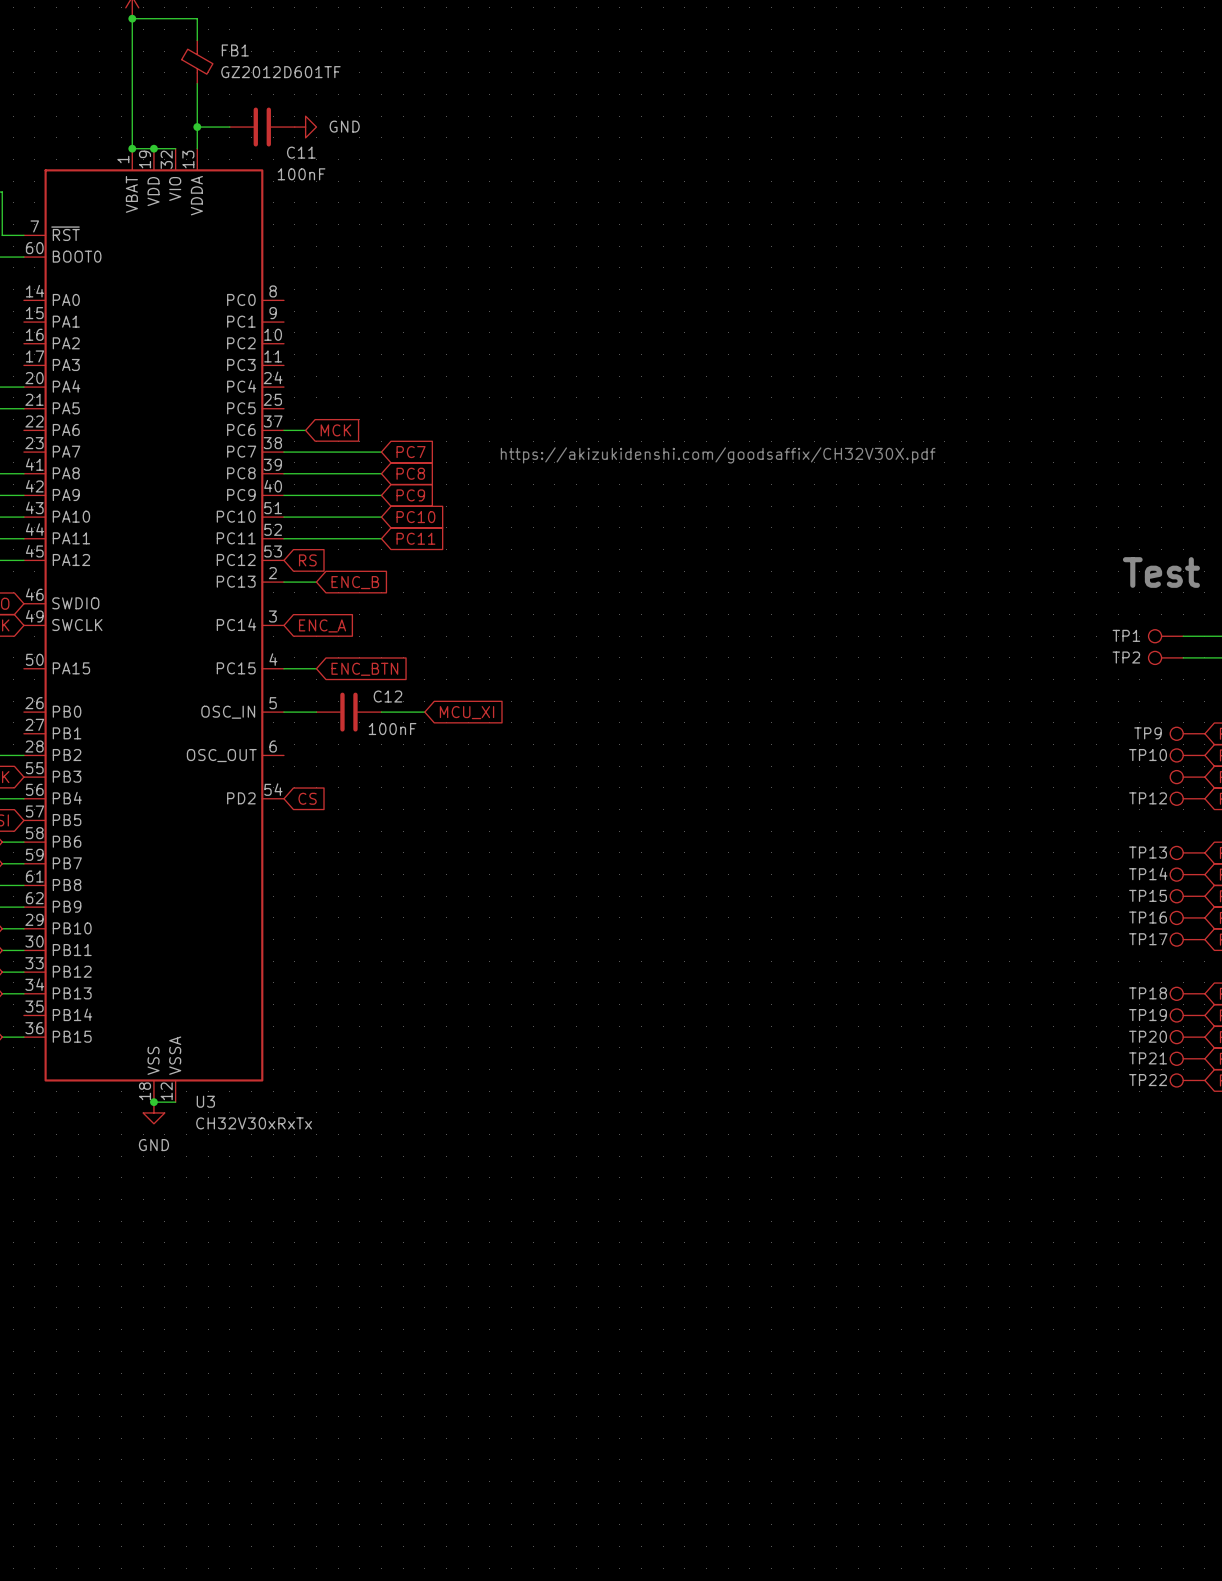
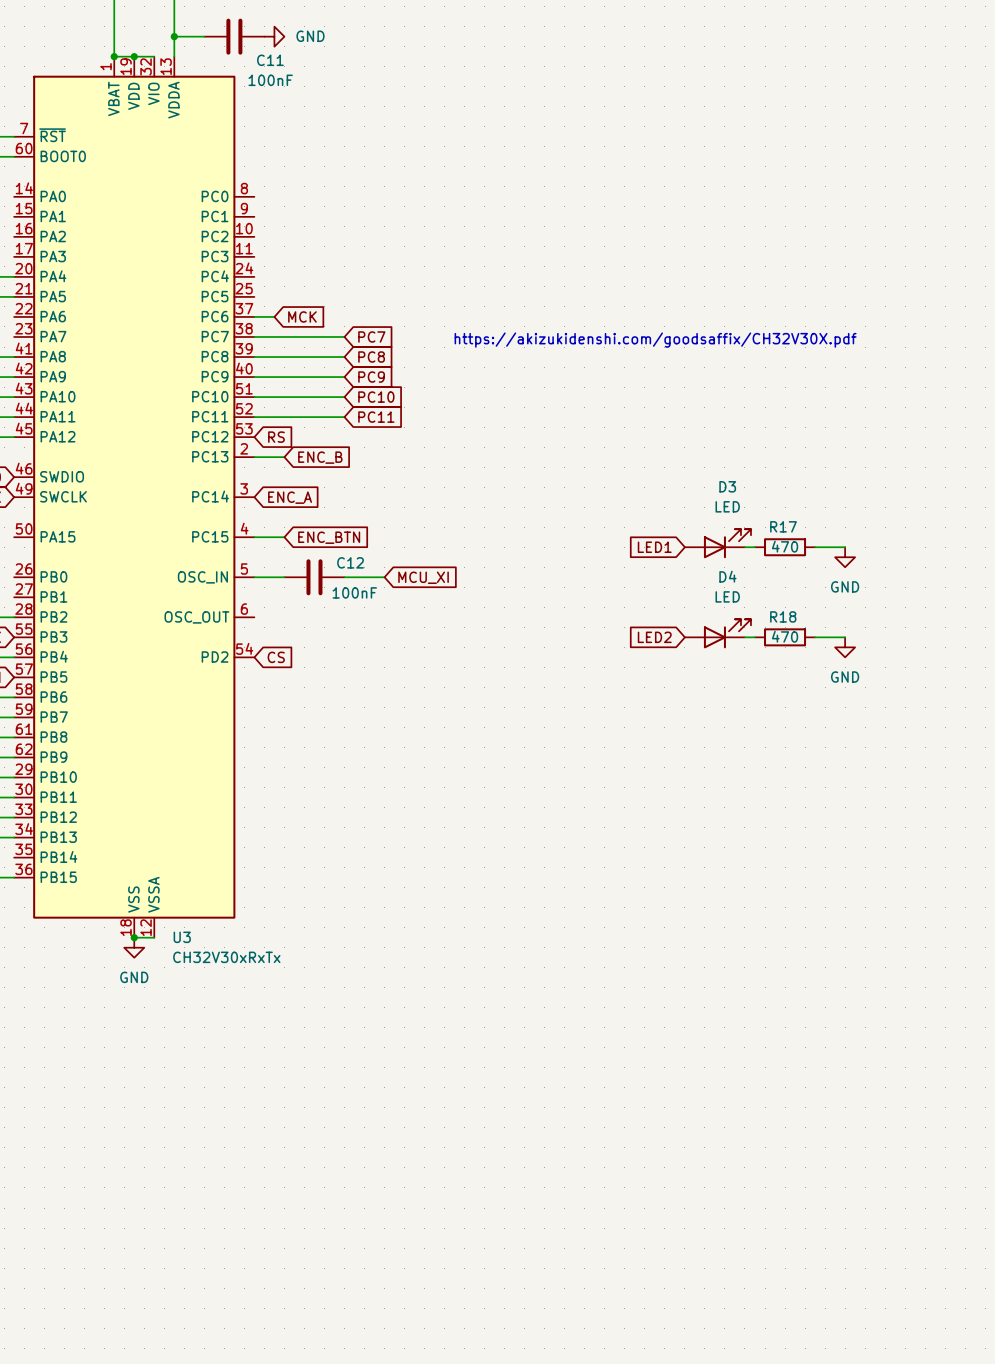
D3: none -> LED (717, 543)
global label: none -> LED1 (654, 547)
wire: none -> (744, 547) (754, 547)
R17: none -> 470 (785, 547)
wire: none -> (815, 547) (845, 547)
power symbol: none -> GND (845, 557)
D4: none -> LED (717, 633)
global label: none -> LED2 (654, 637)
wire: none -> (744, 637) (754, 637)
R18: none -> 470 (785, 637)
wire: none -> (815, 637) (845, 637)
power symbol: none -> GND (845, 647)

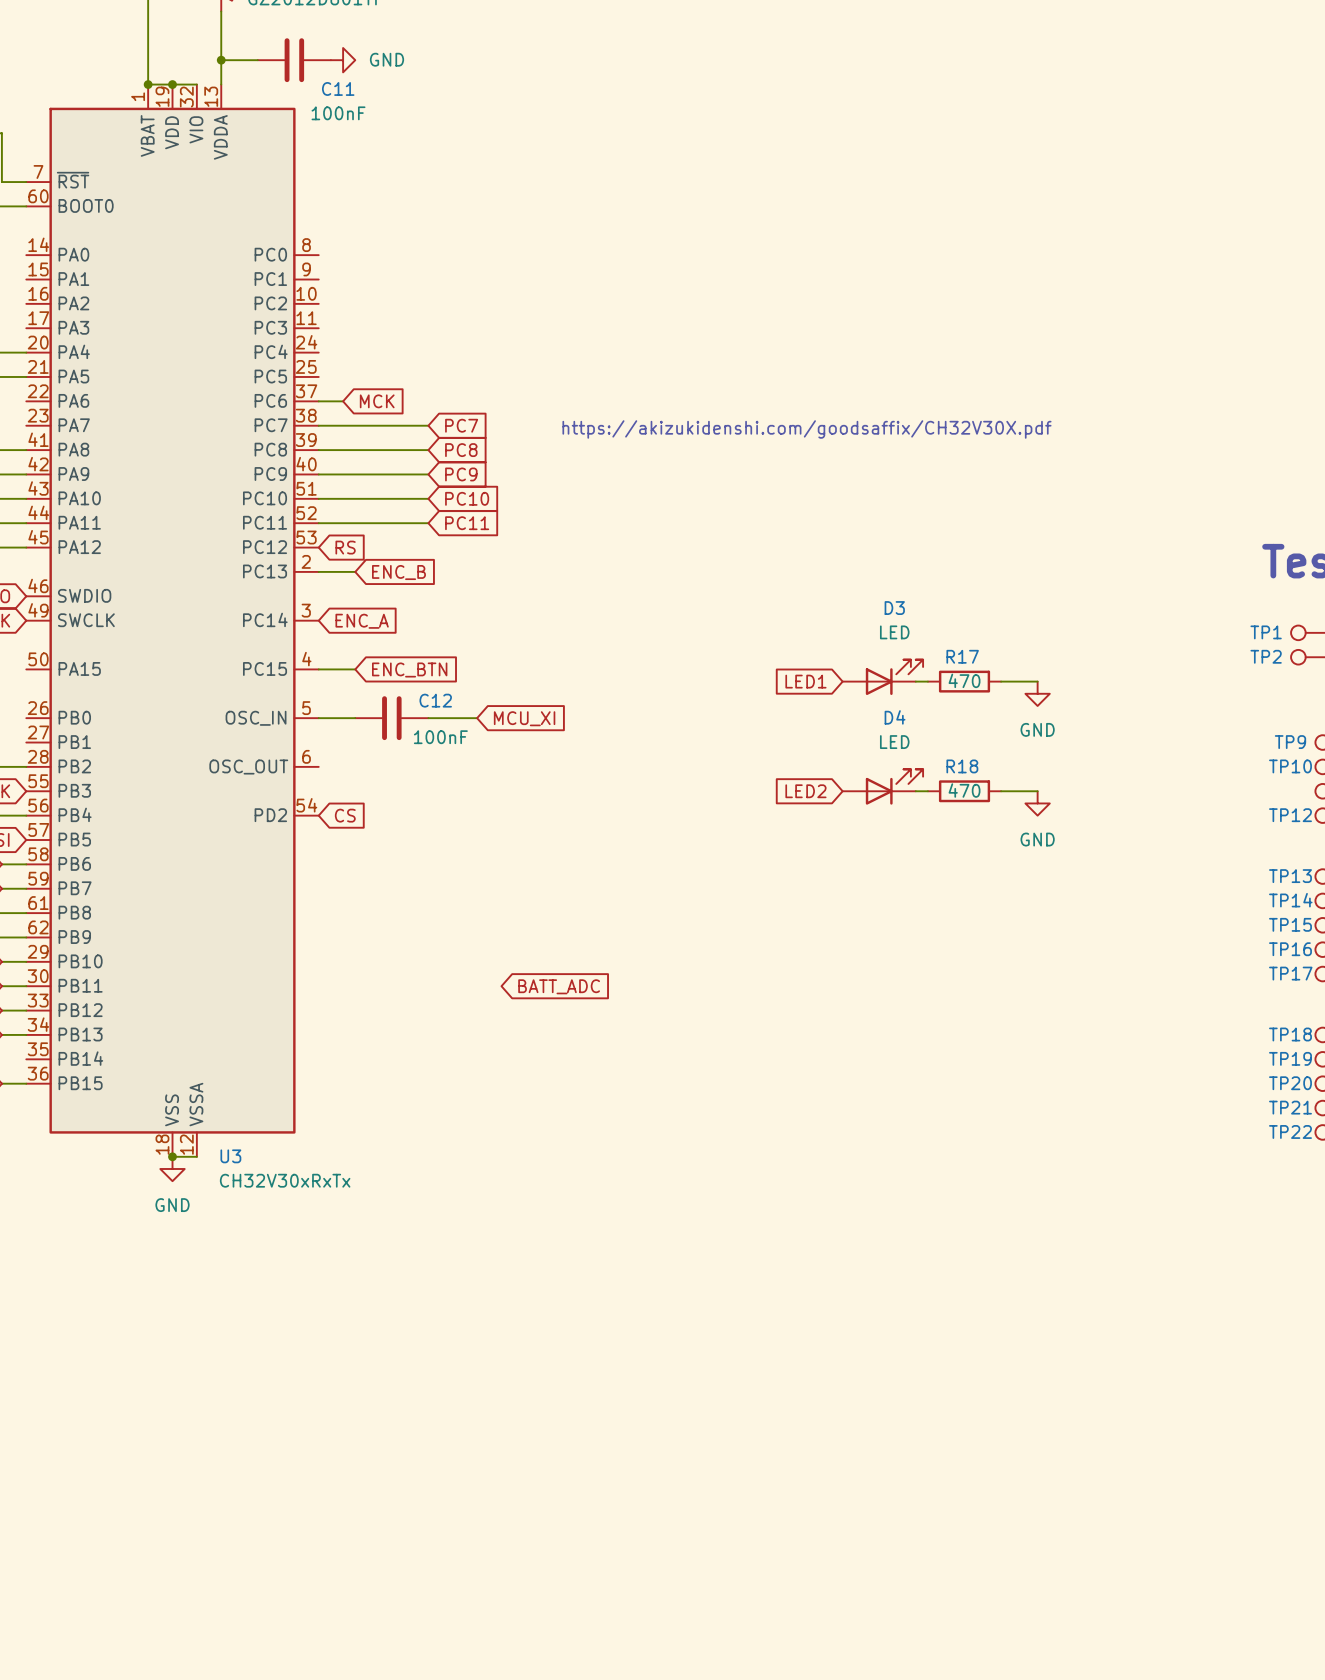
global label: none -> BATT_ADC (559, 986)

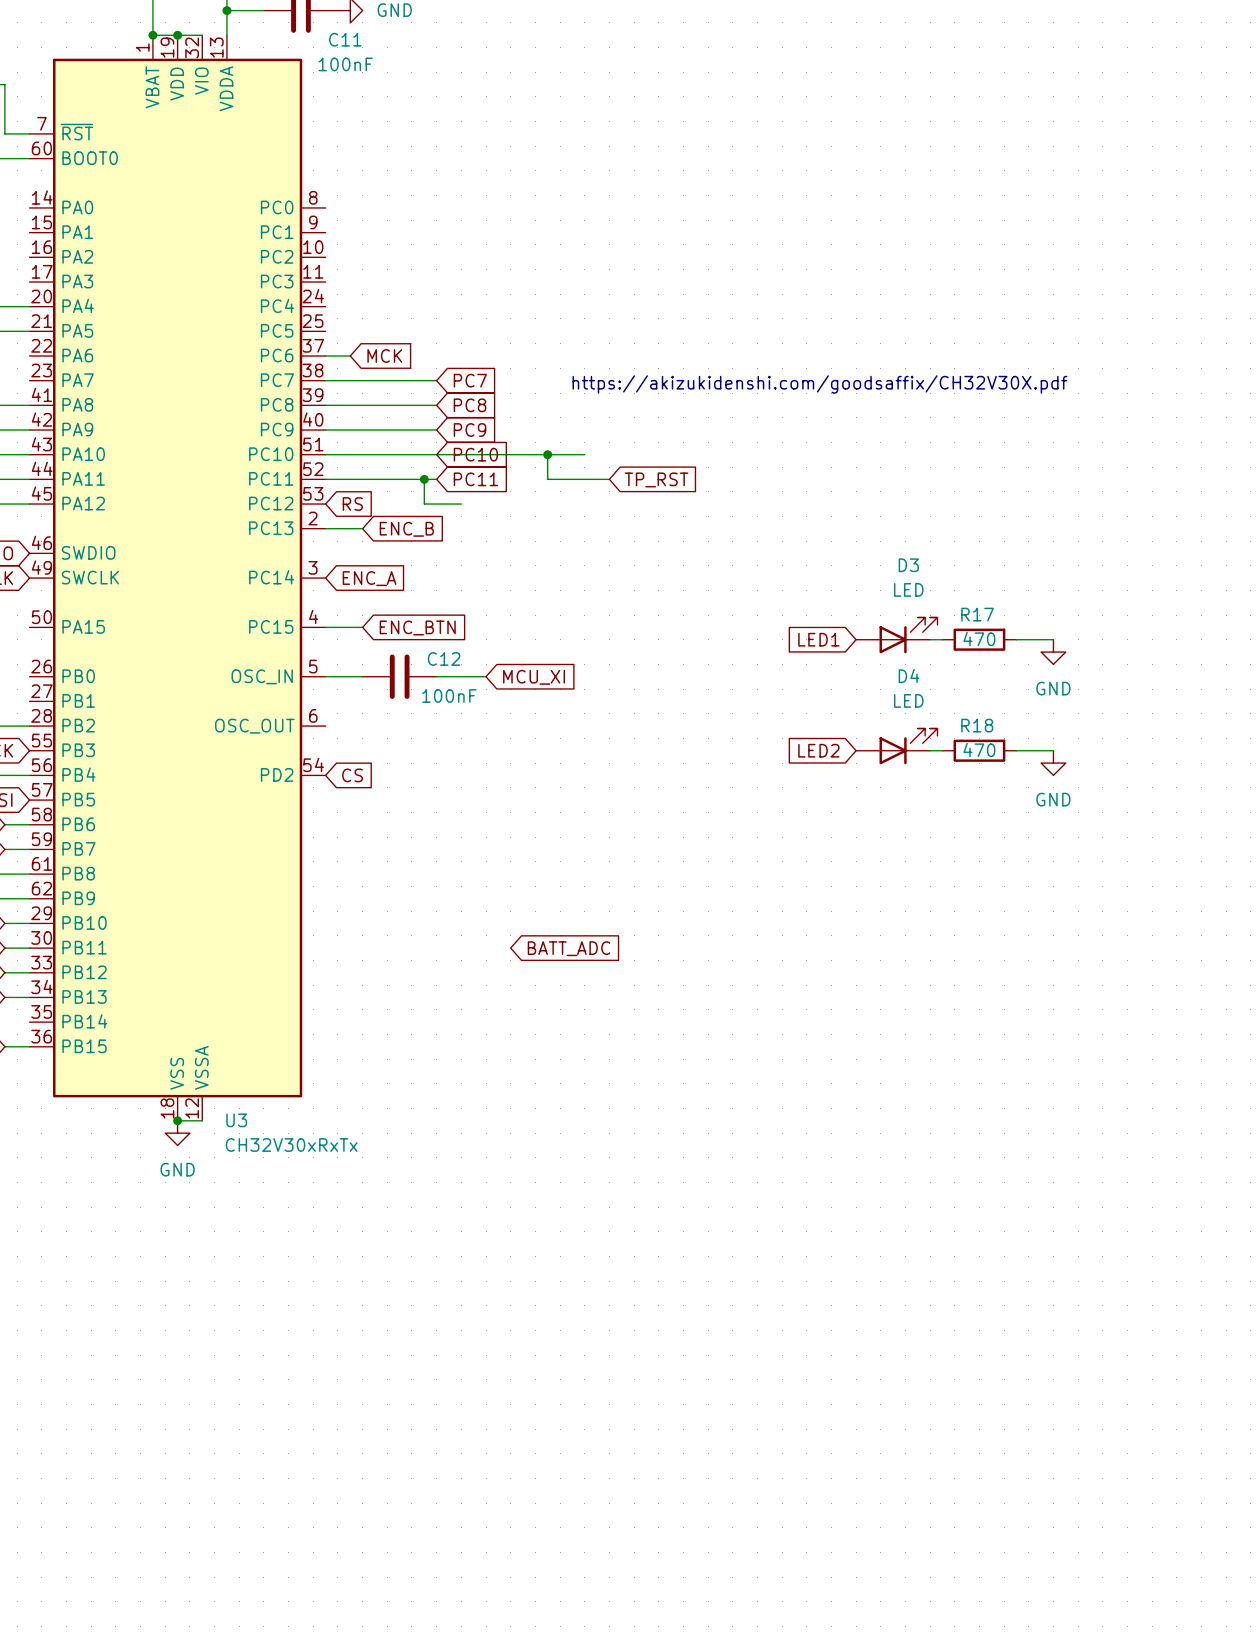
wire: none -> (436, 454) (584, 454)
wire: none -> (547, 454) (547, 479) (609, 479)
junction: none -> (547, 454)
wire: none -> (424, 479) (424, 504) (461, 504)
junction: none -> (424, 479)
global label: none -> TP_RST (656, 479)

